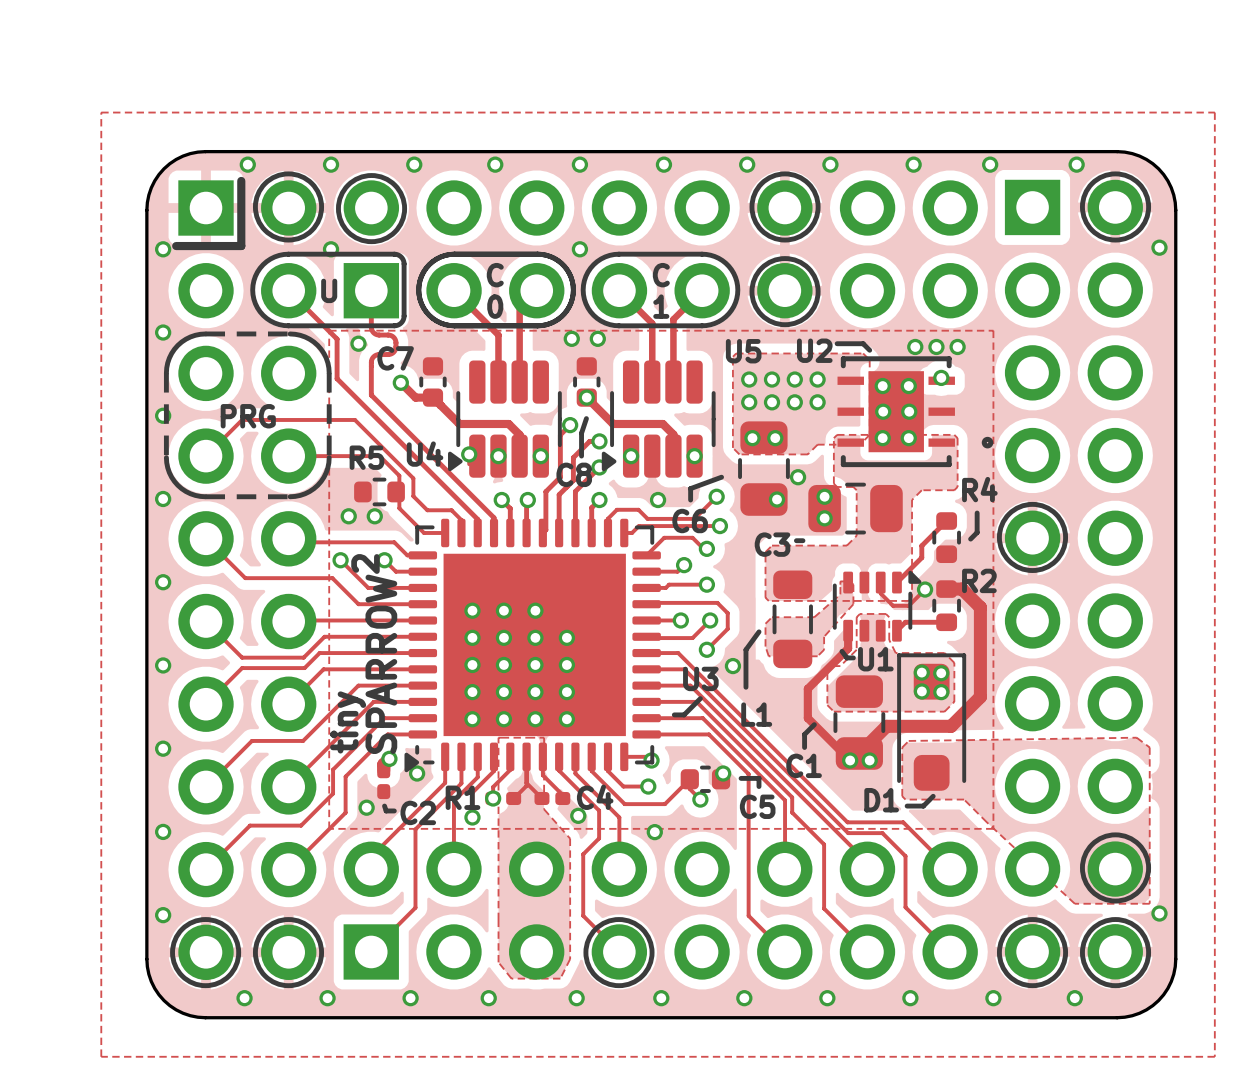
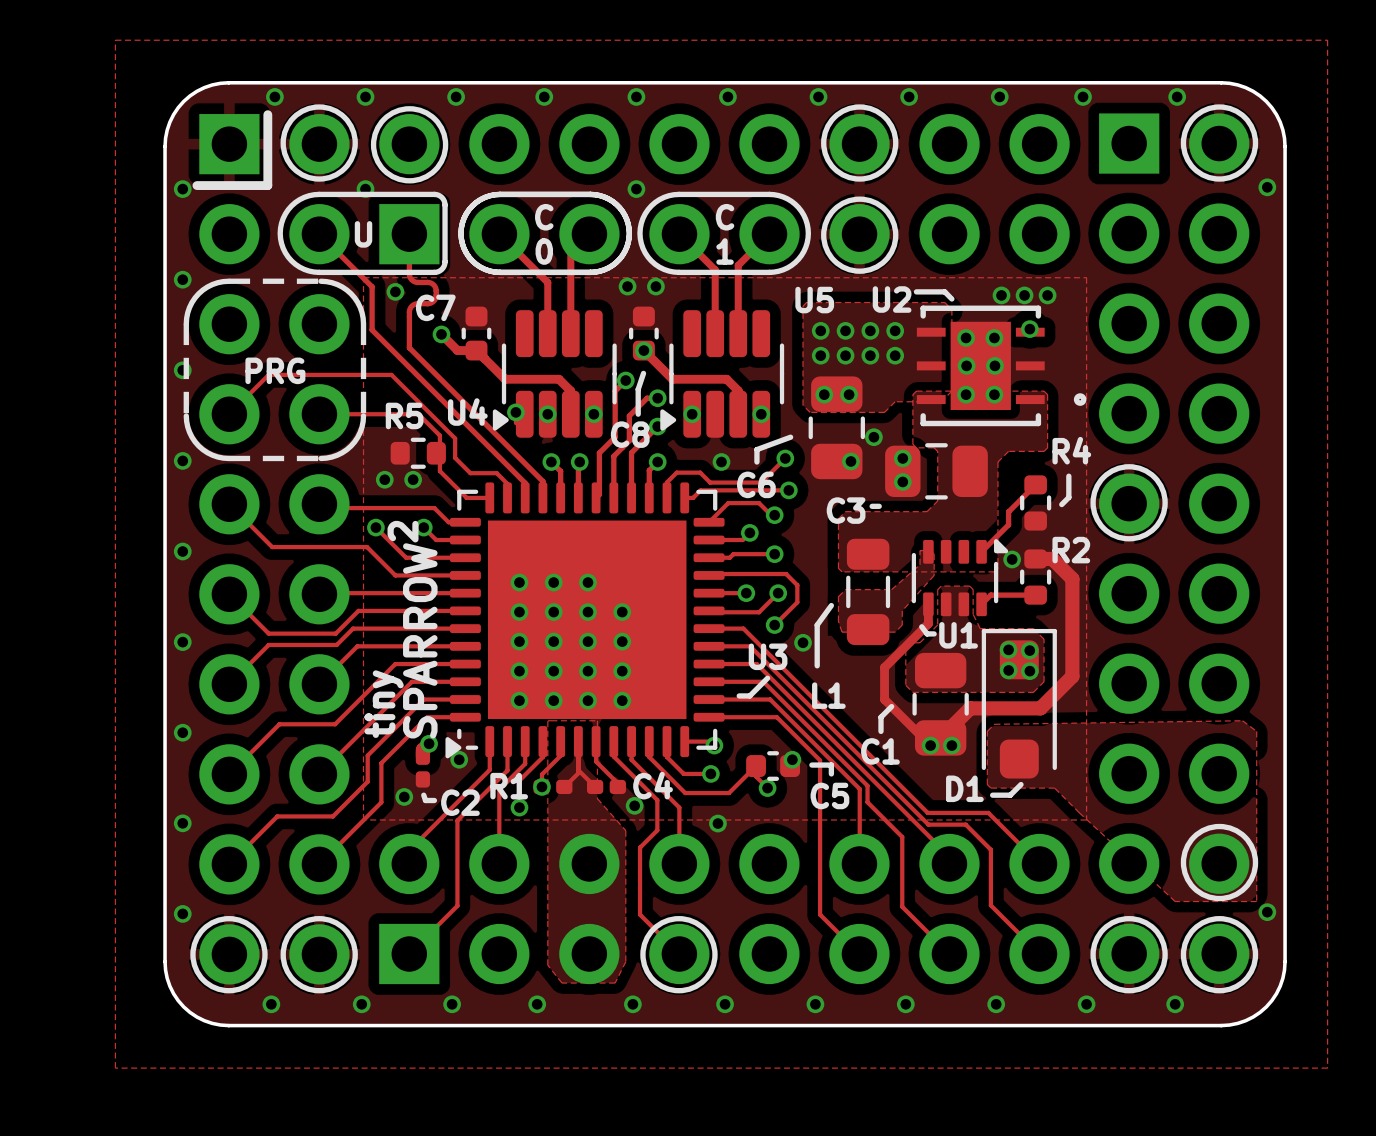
track: (880, 582) (880, 593) (893, 605) (908, 605) (925, 589) -> none

